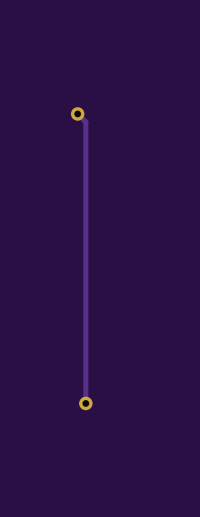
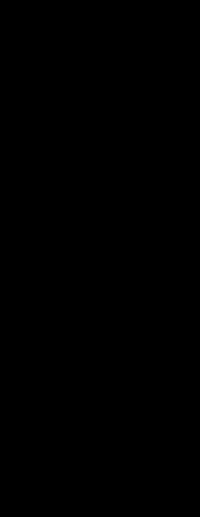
track: (77, 113) (85, 122) (85, 403) -> none
via: (77, 113) -> none
via: (85, 403) -> none

